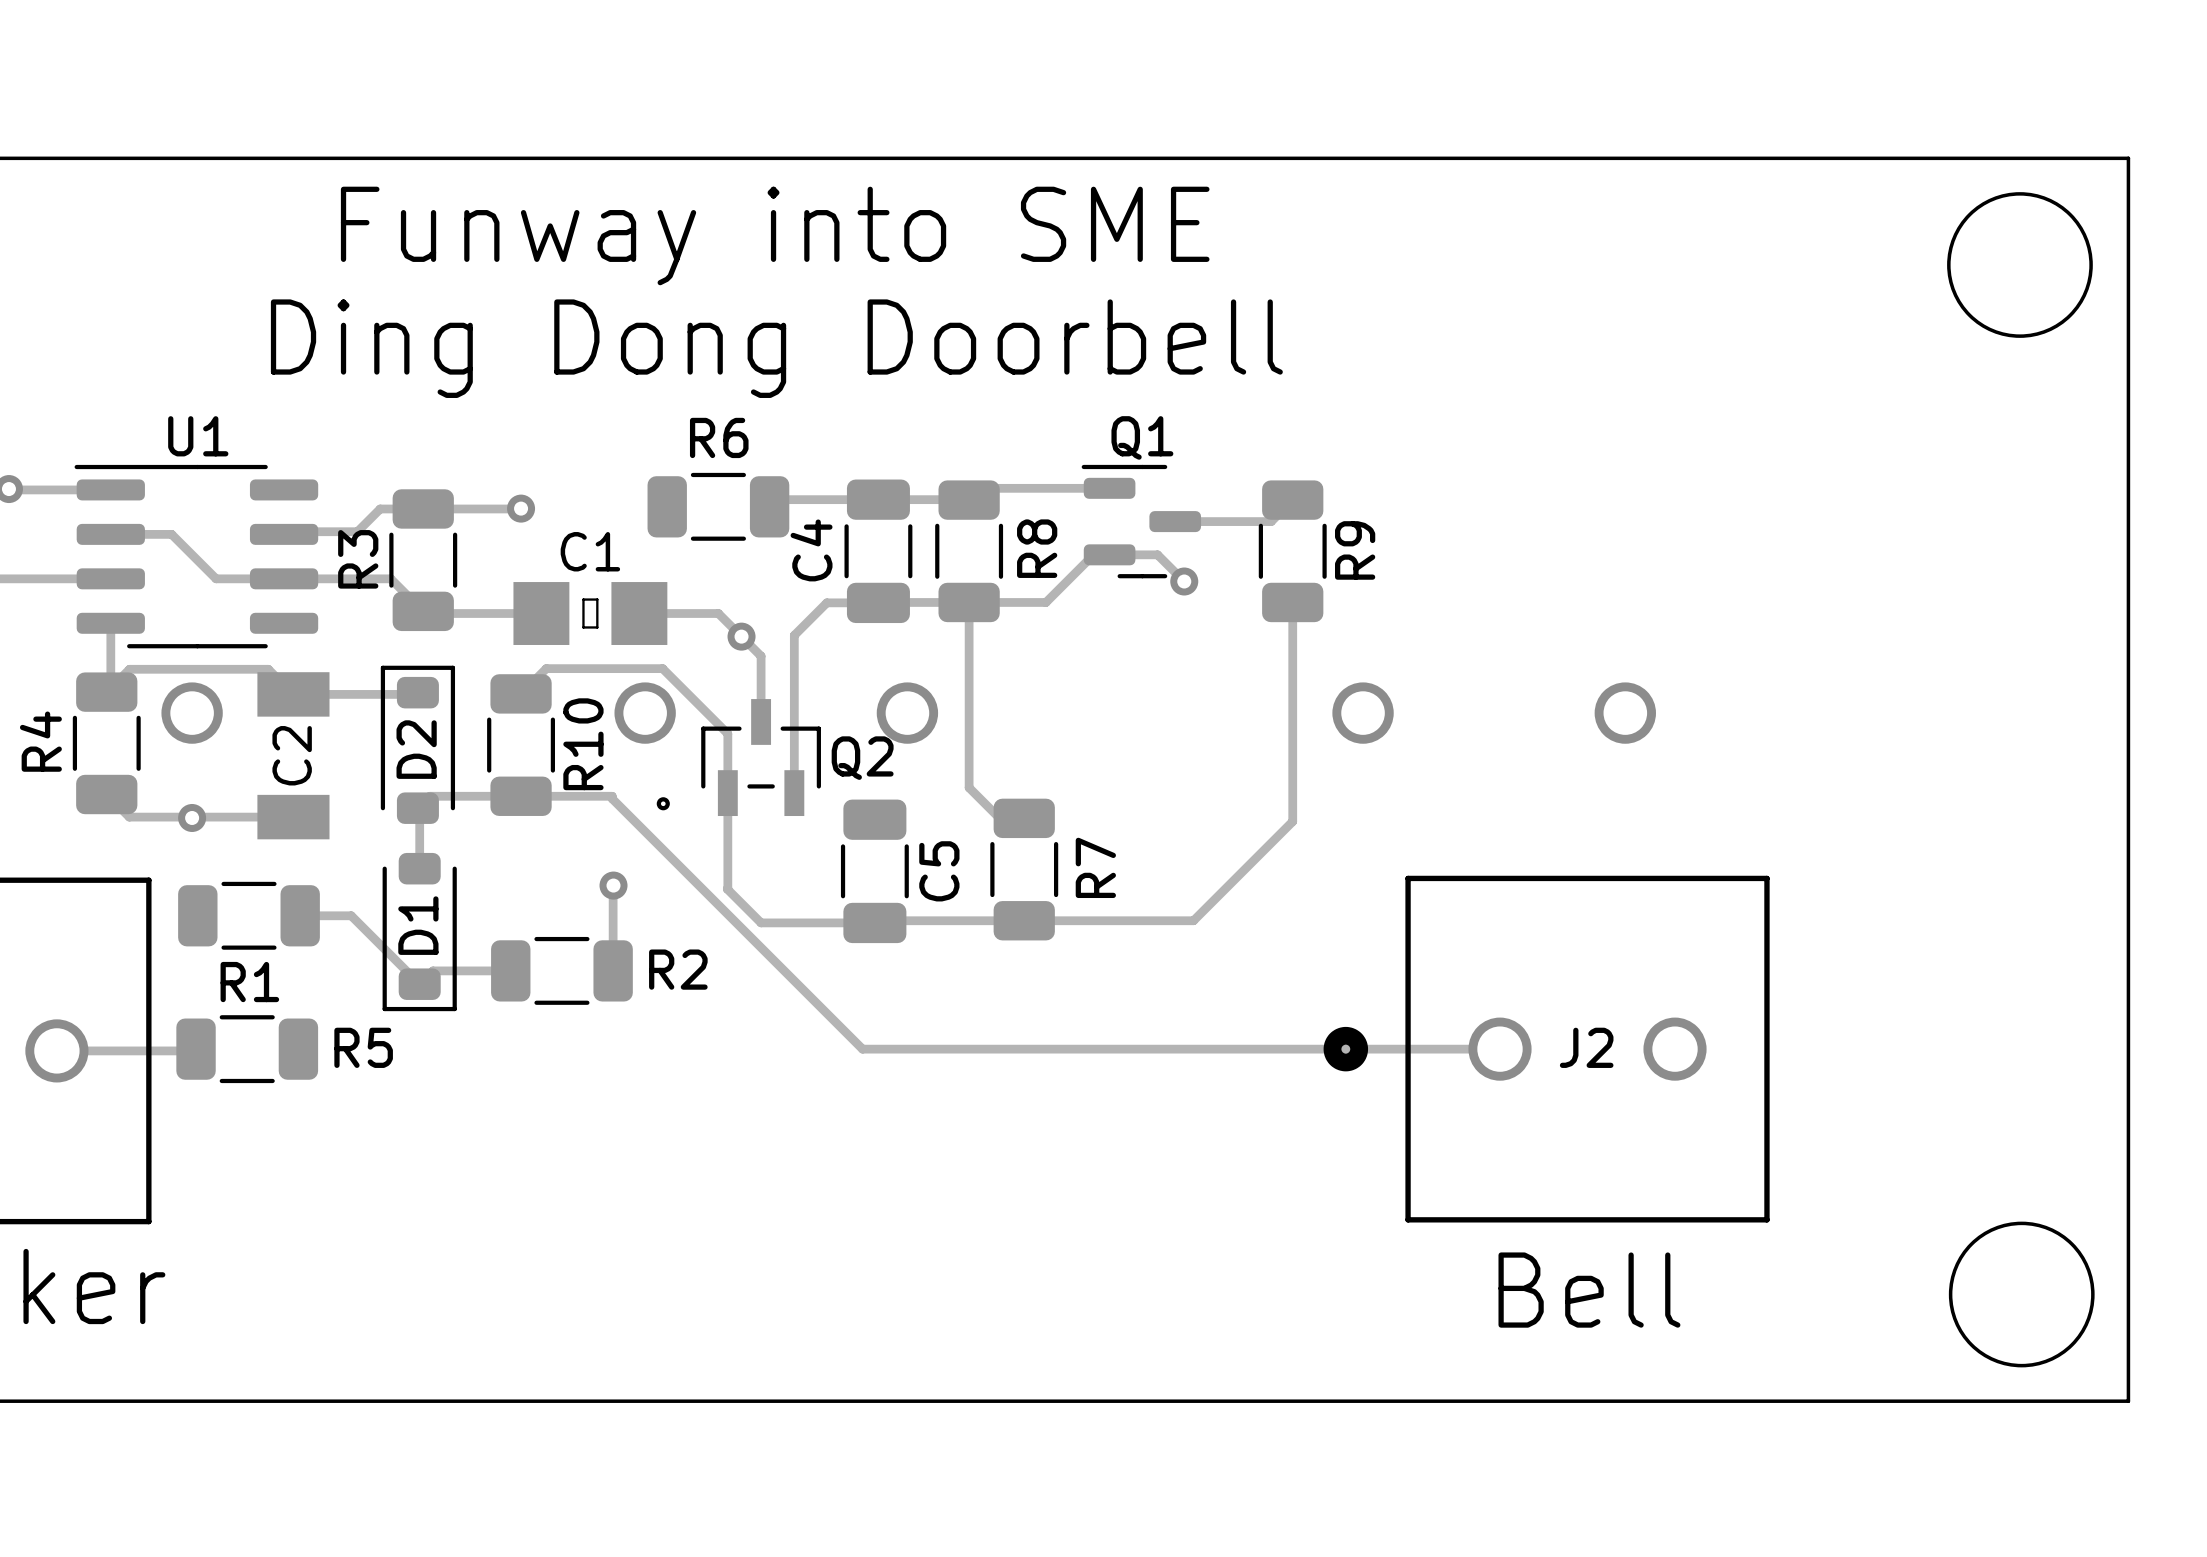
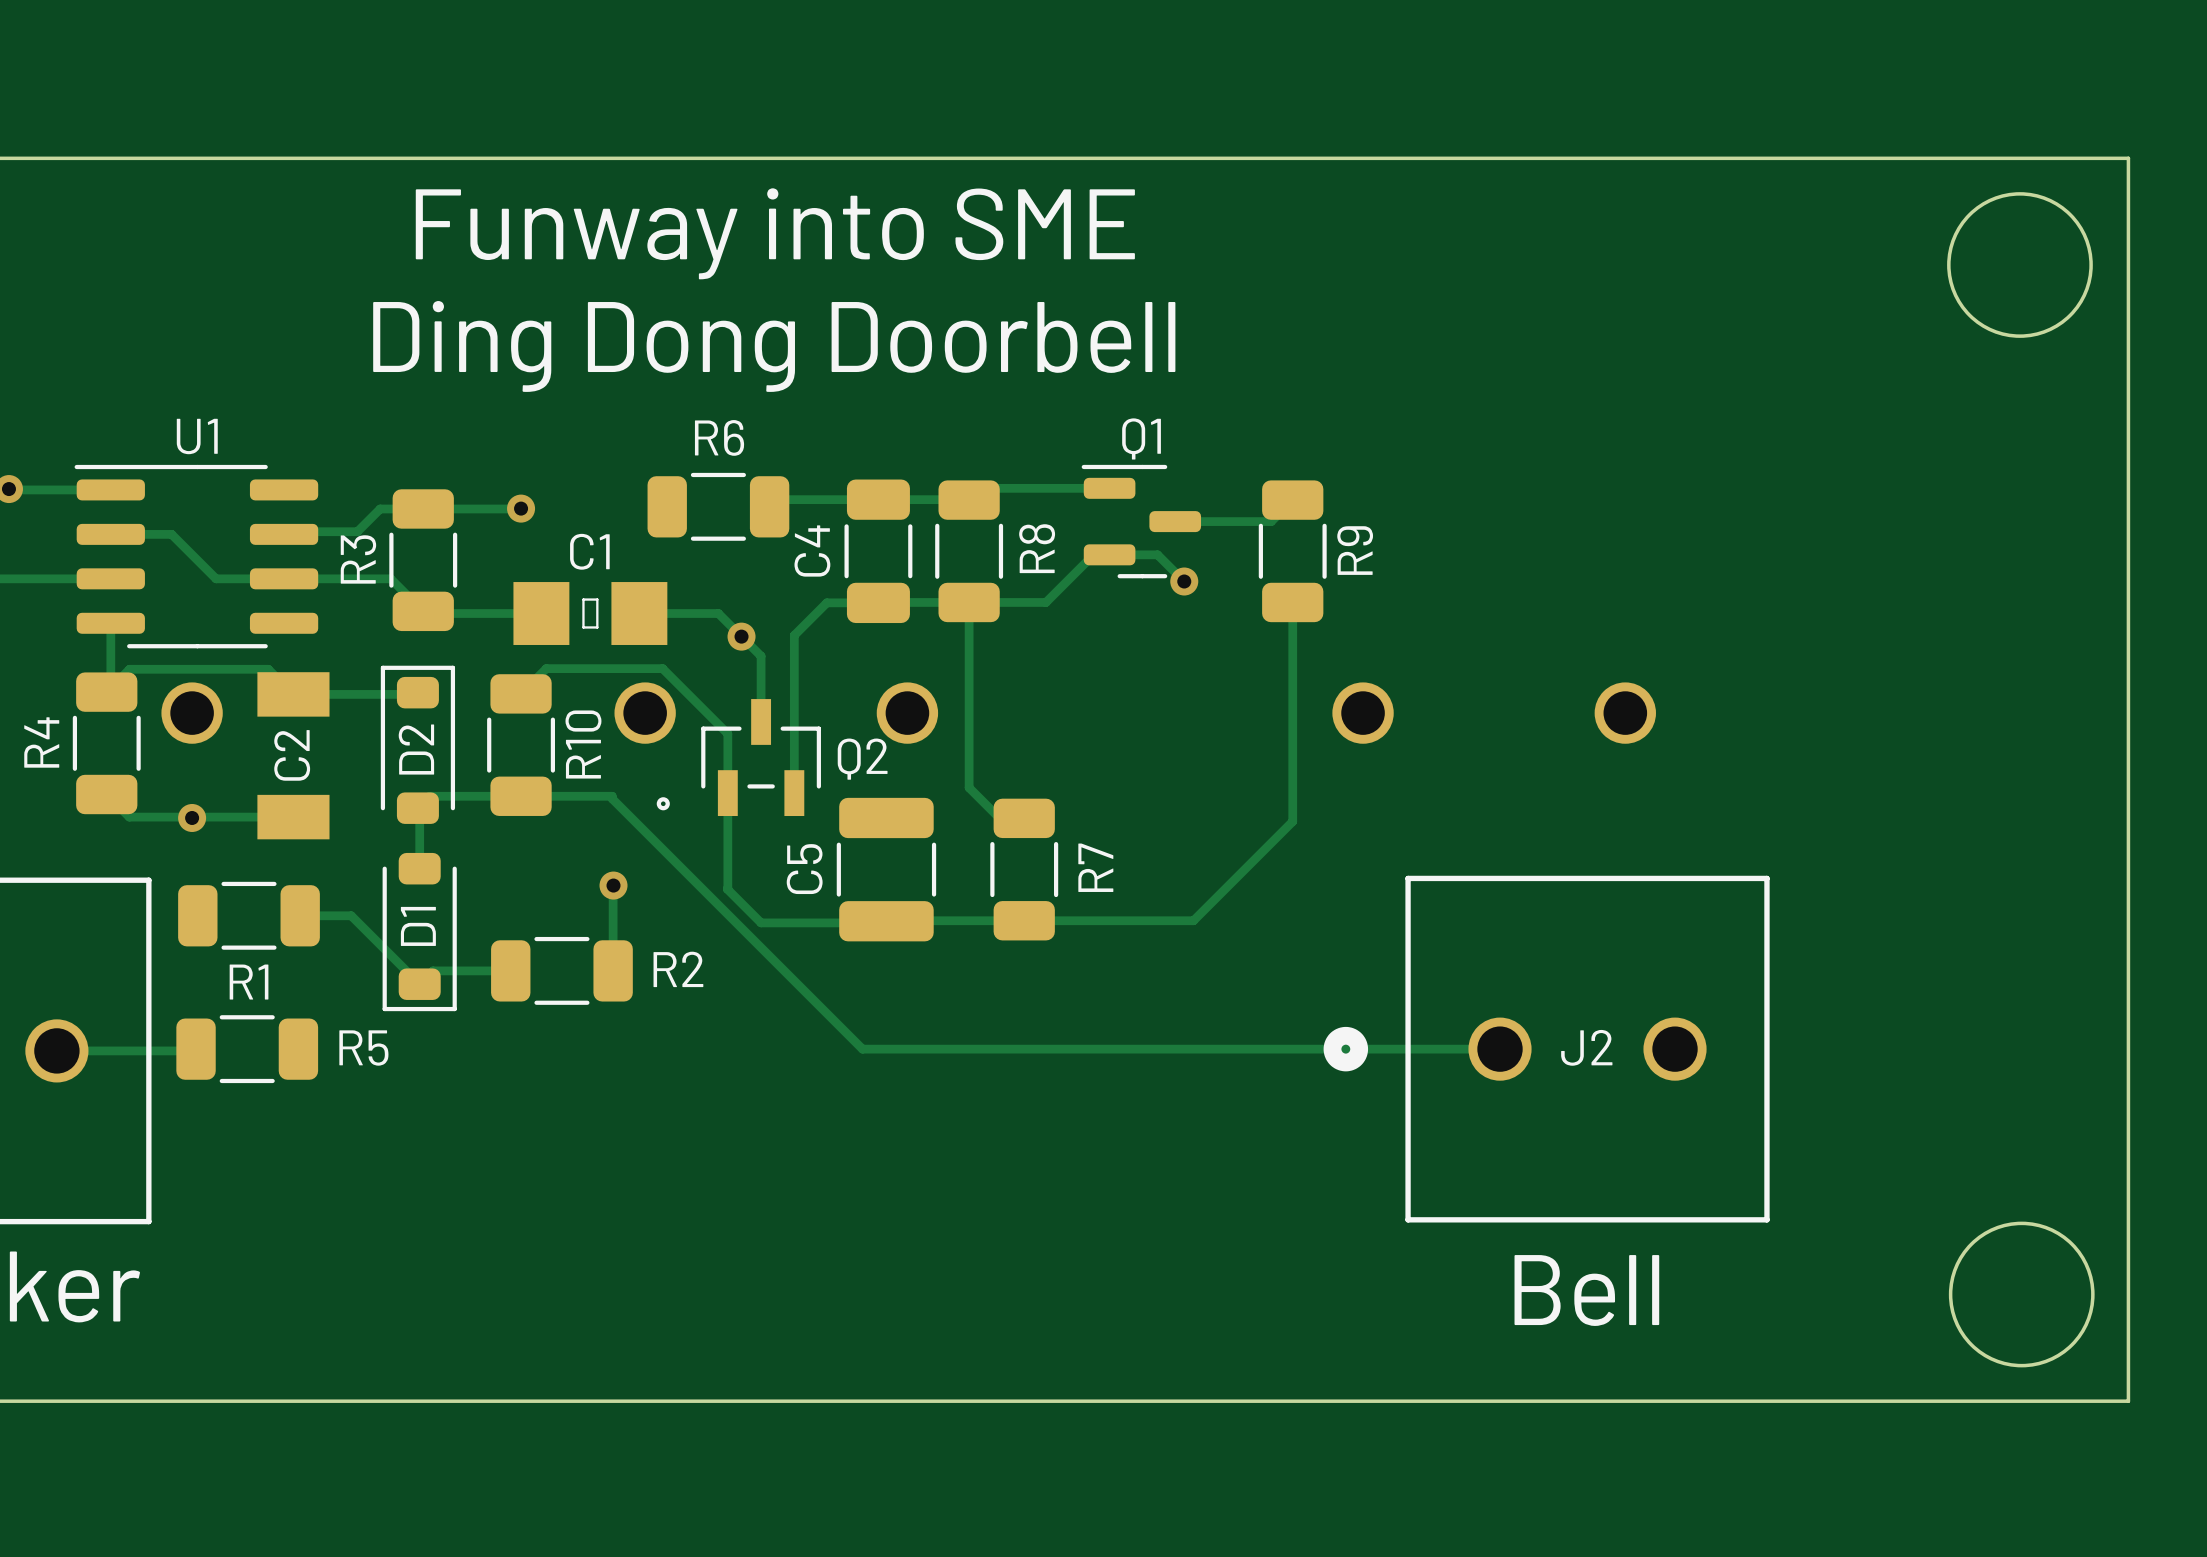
C5 footprint: [840, 799, 909, 944] -> [836, 797, 937, 942]
C5 name position: C5 (939, 871) -> C5 (804, 869)

